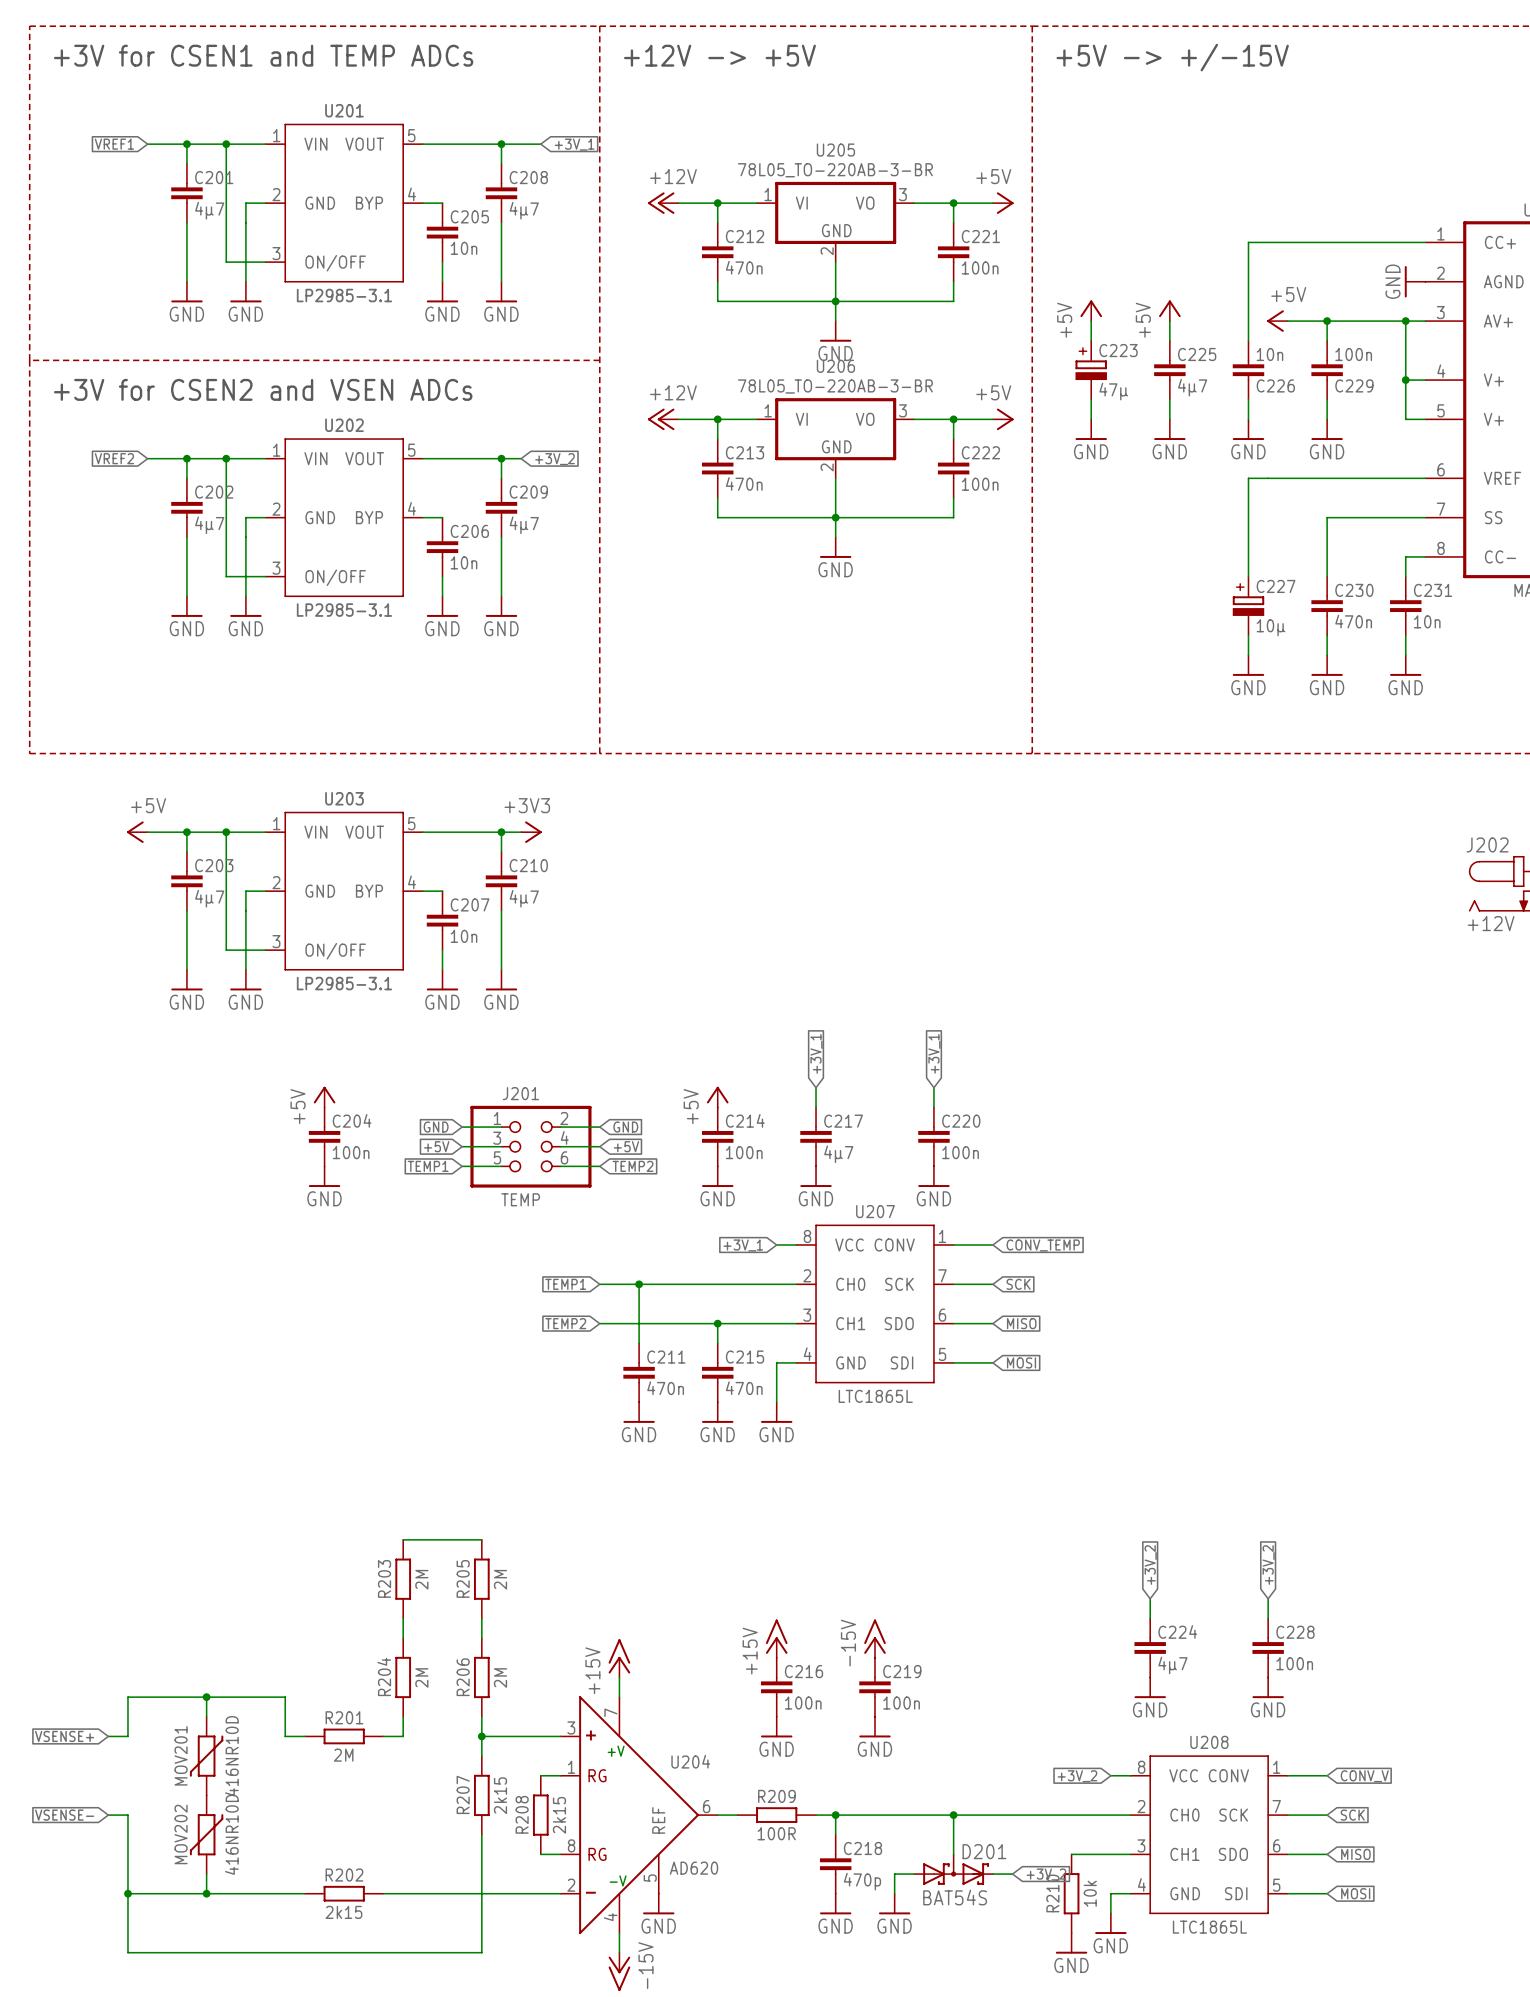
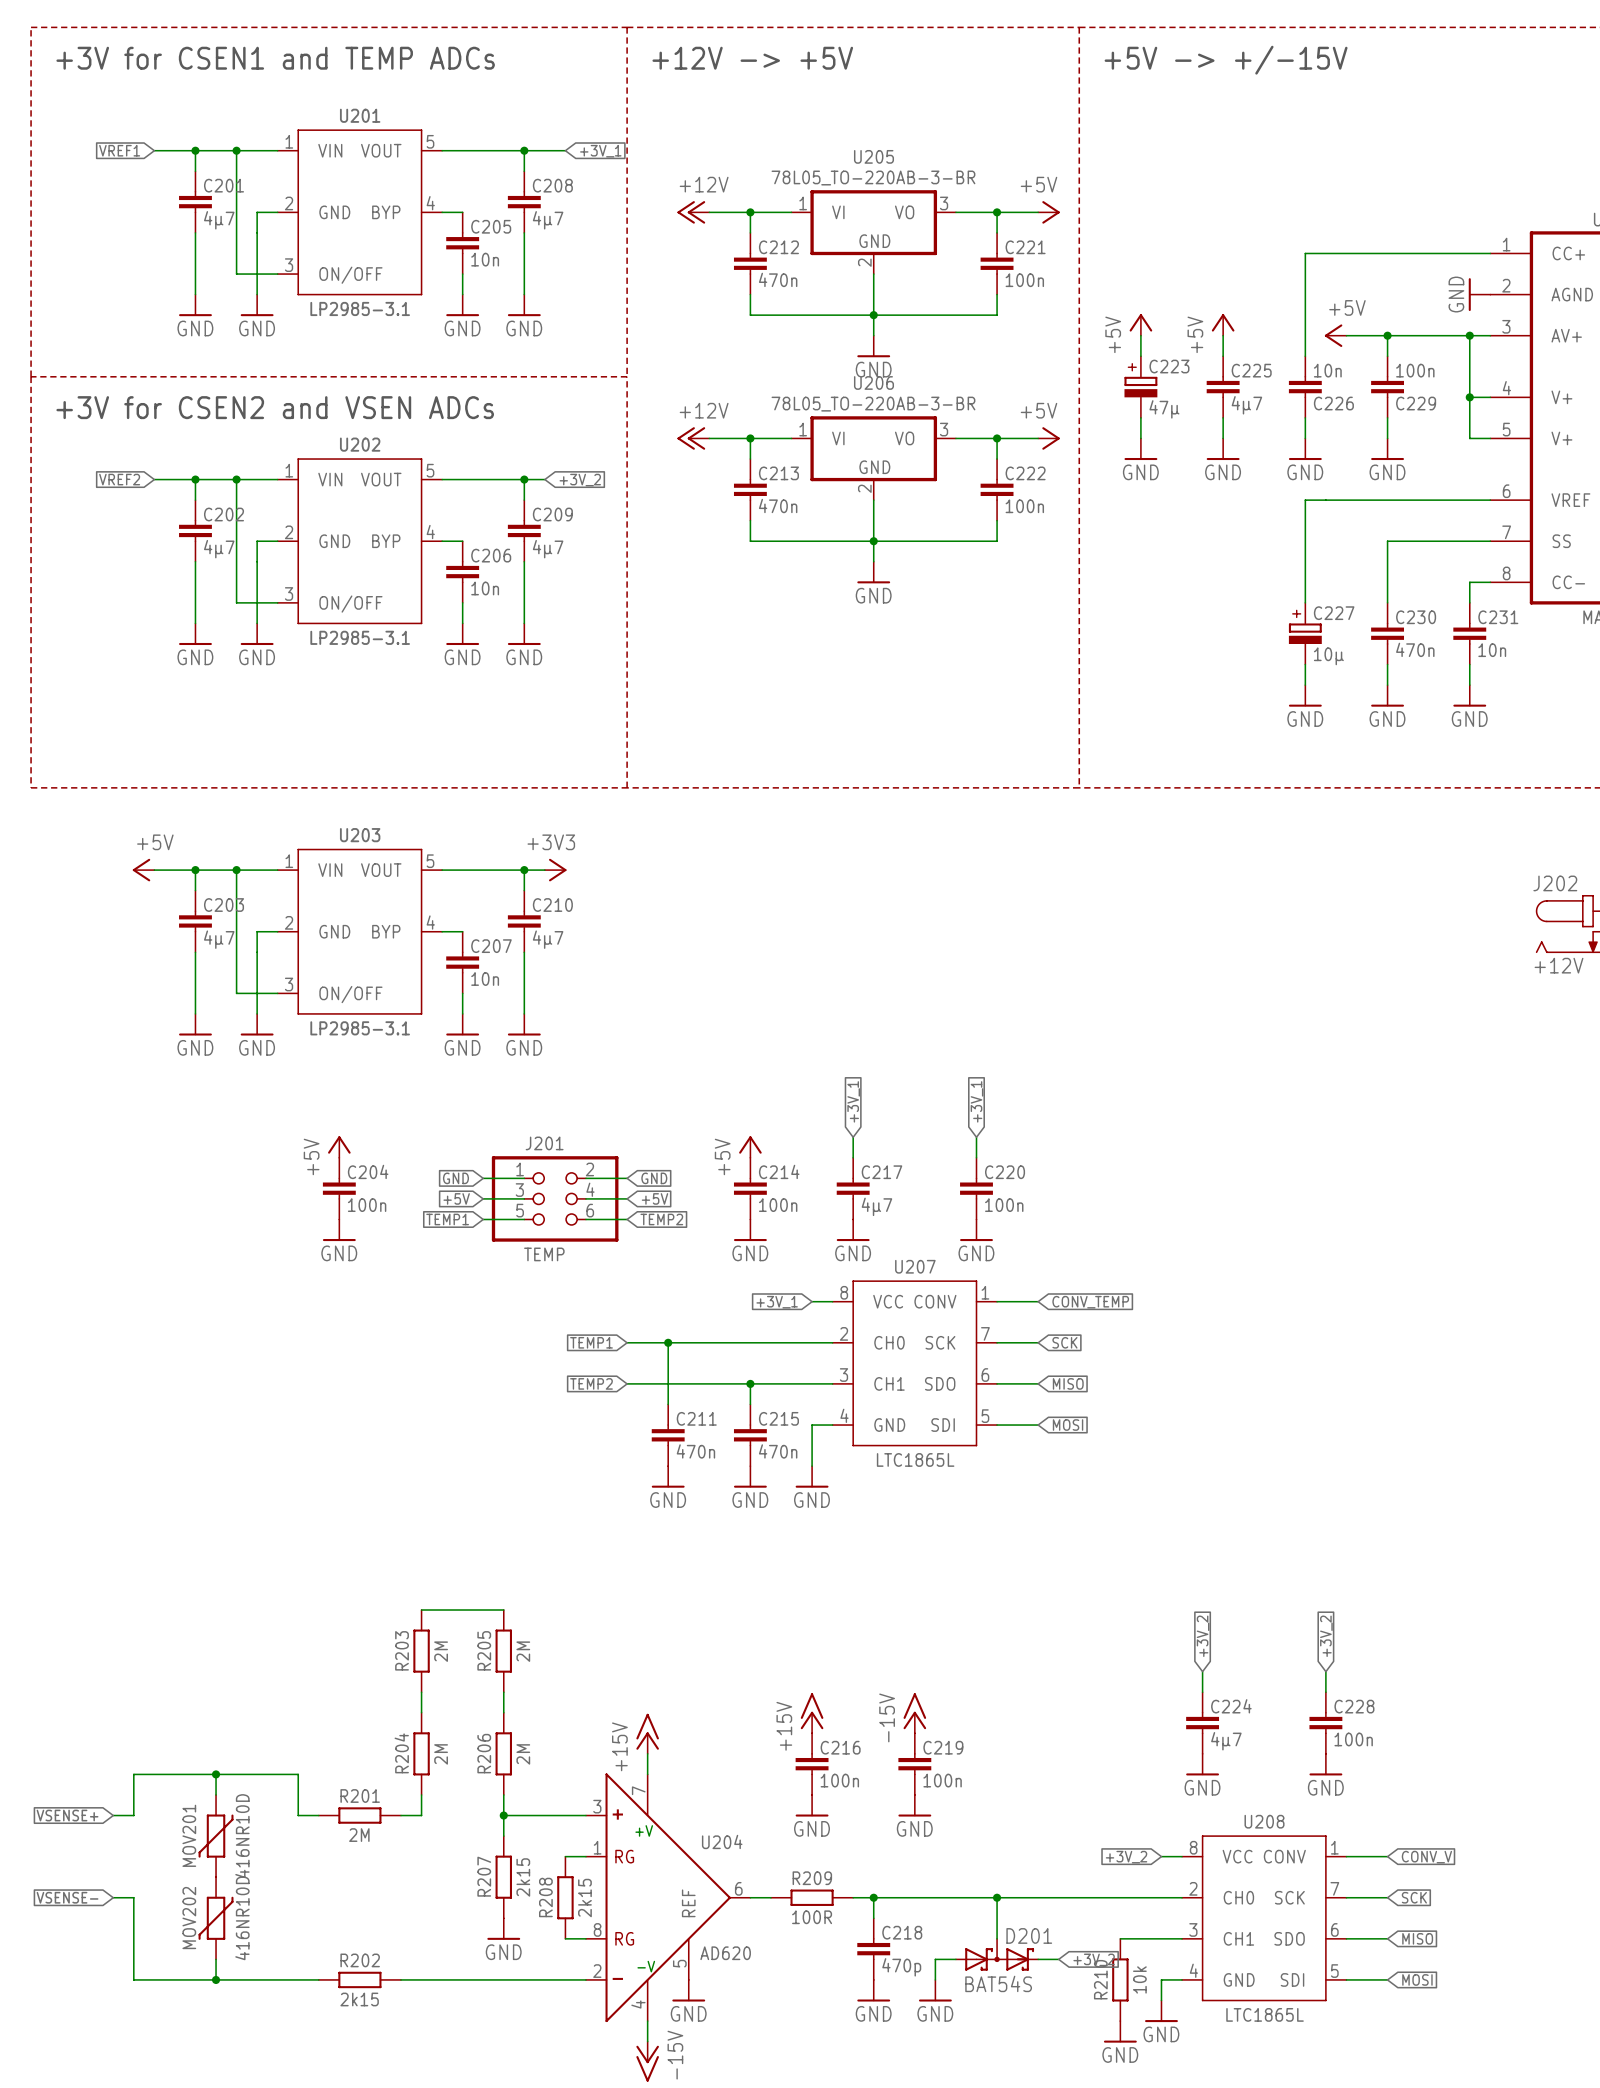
wire: (481, 1834) (481, 1952) (127, 1952) (127, 1893) -> none
power symbol: none -> GND (503, 1929)
junction: (127, 1893) -> none

